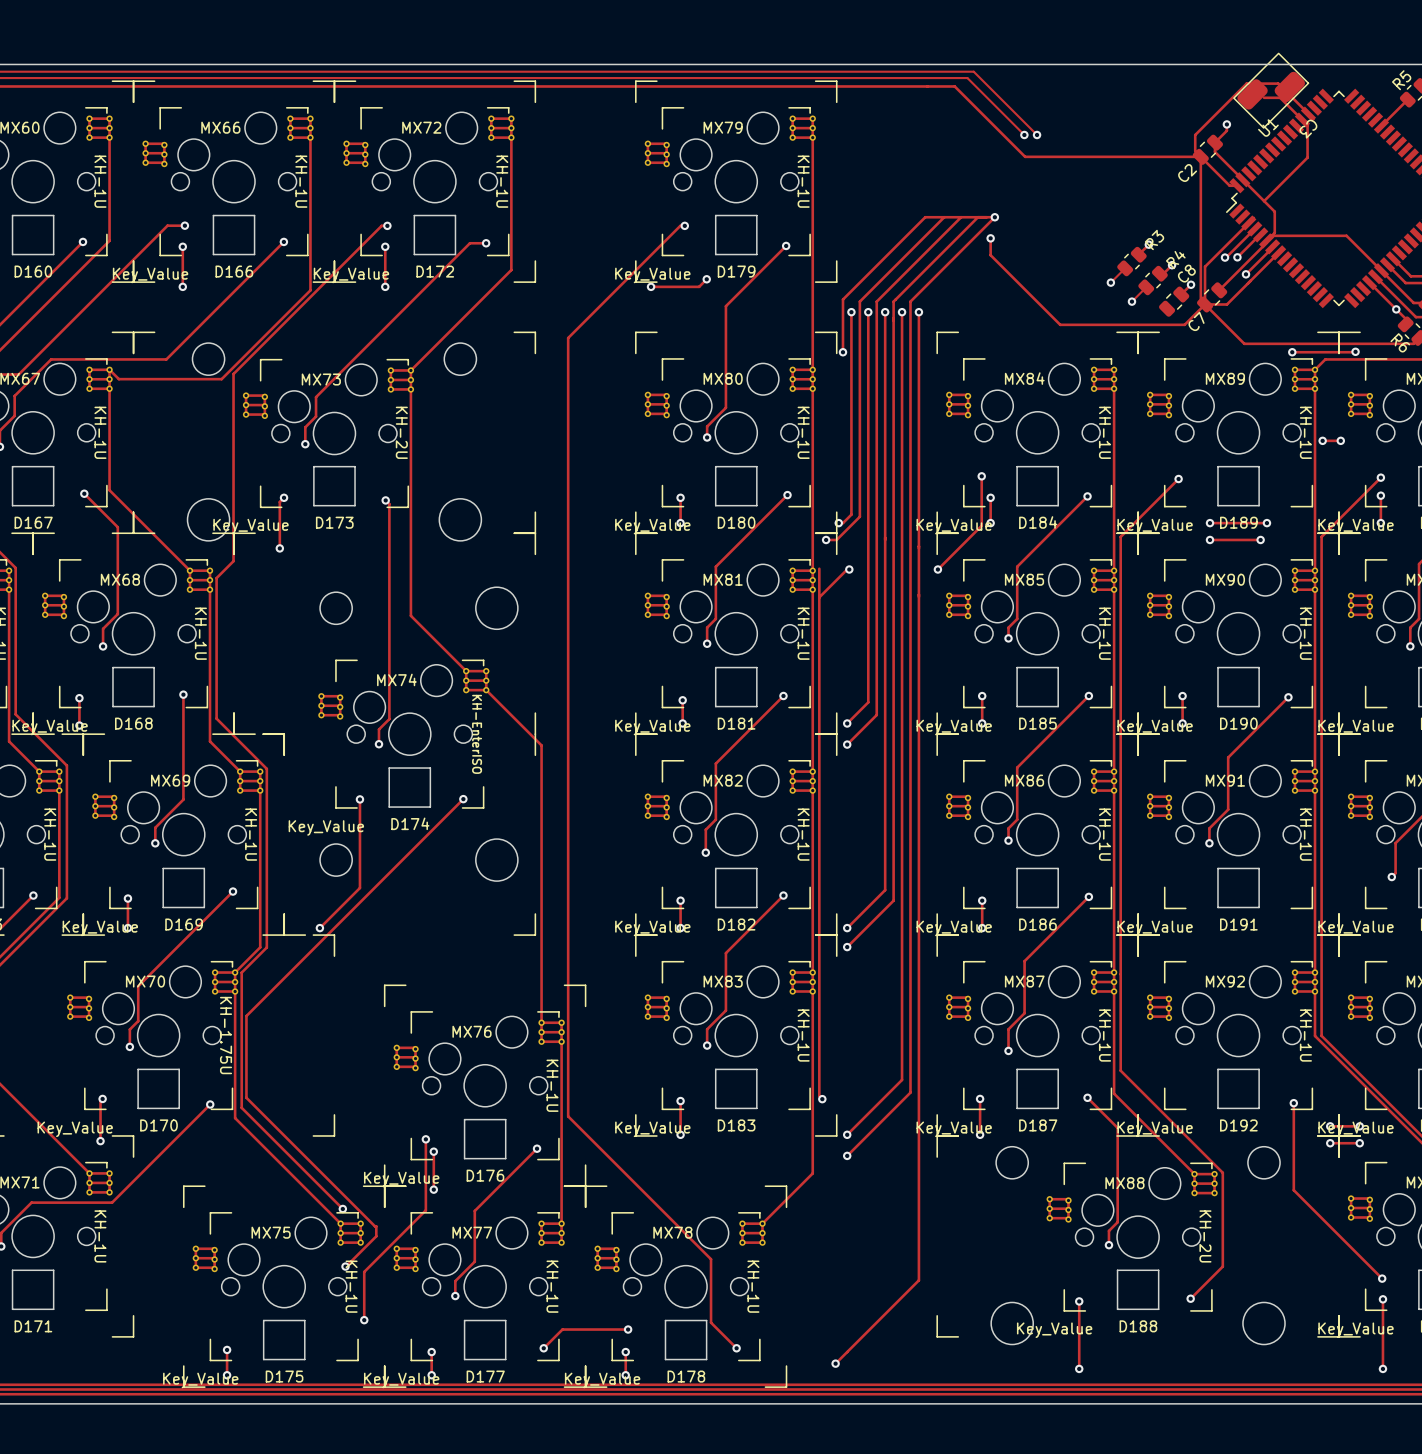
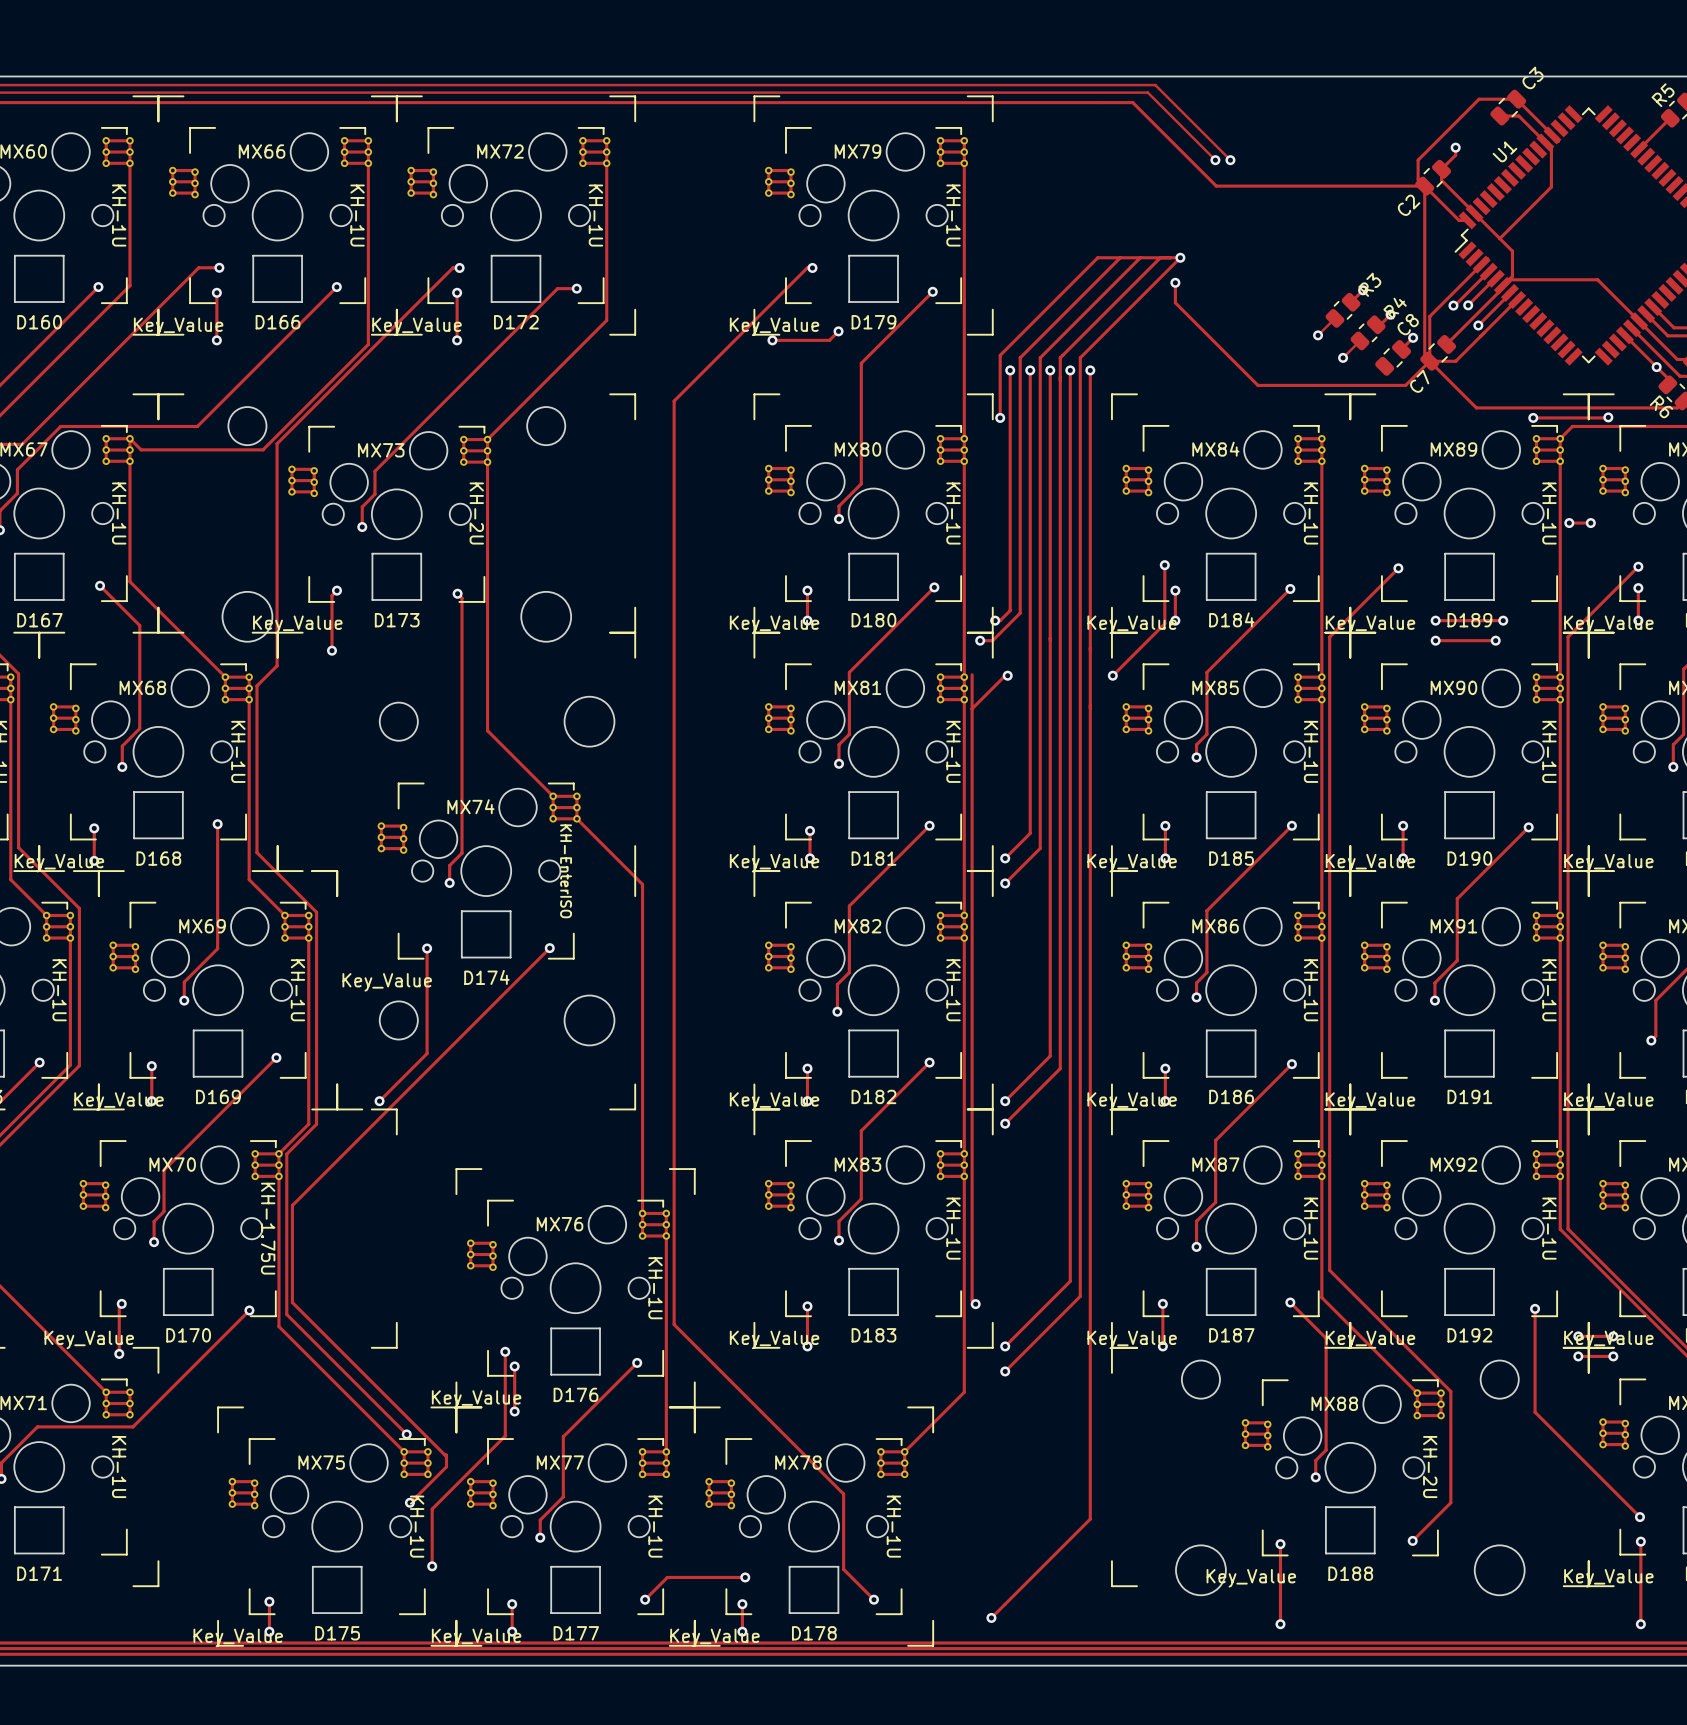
C3 footprint: [1233, 52, 1310, 129] -> [1490, 89, 1527, 126]
C3 name position: C3 (1308, 129) -> C3 (1533, 77)

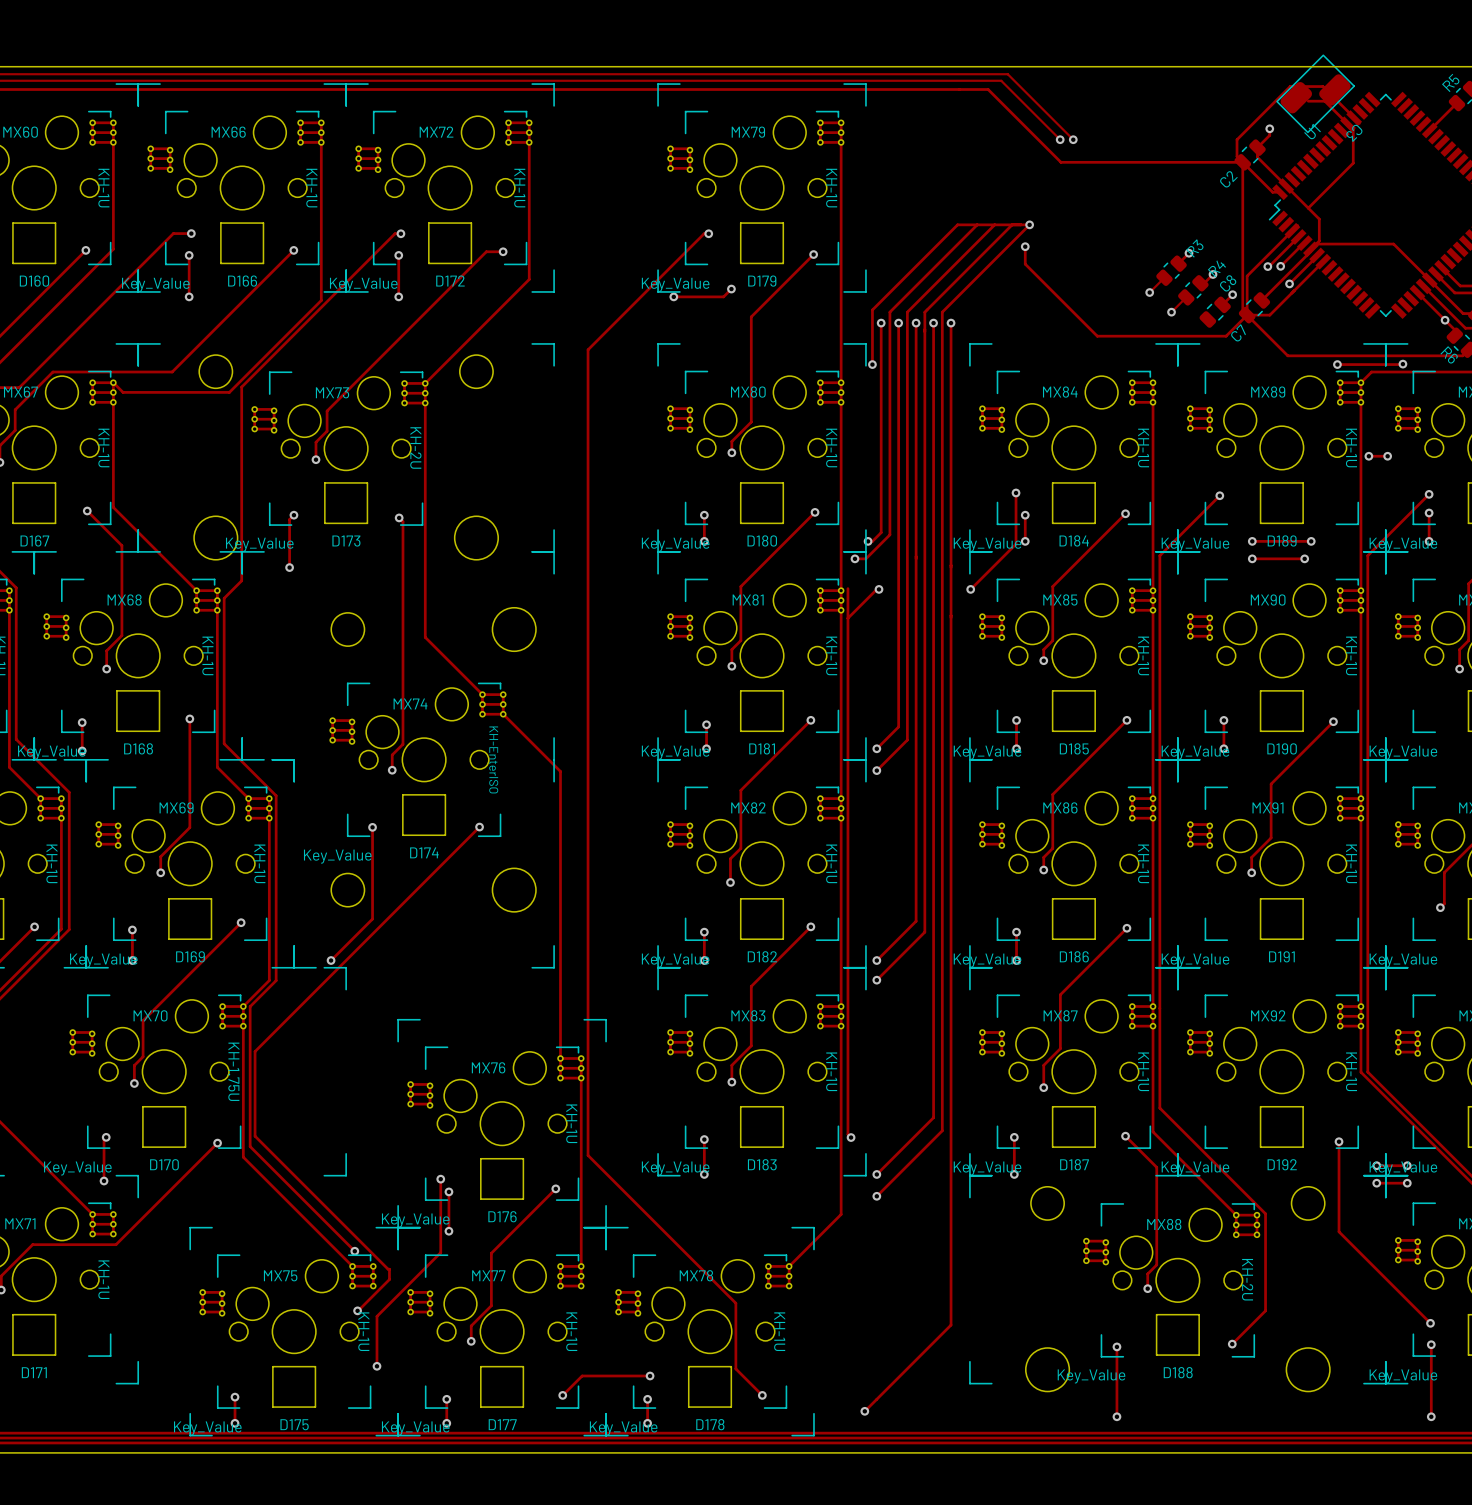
C3 name position: C3 (1533, 77) -> C3 (1354, 133)
C3 footprint: [1490, 89, 1527, 126] -> [1276, 54, 1355, 134]

